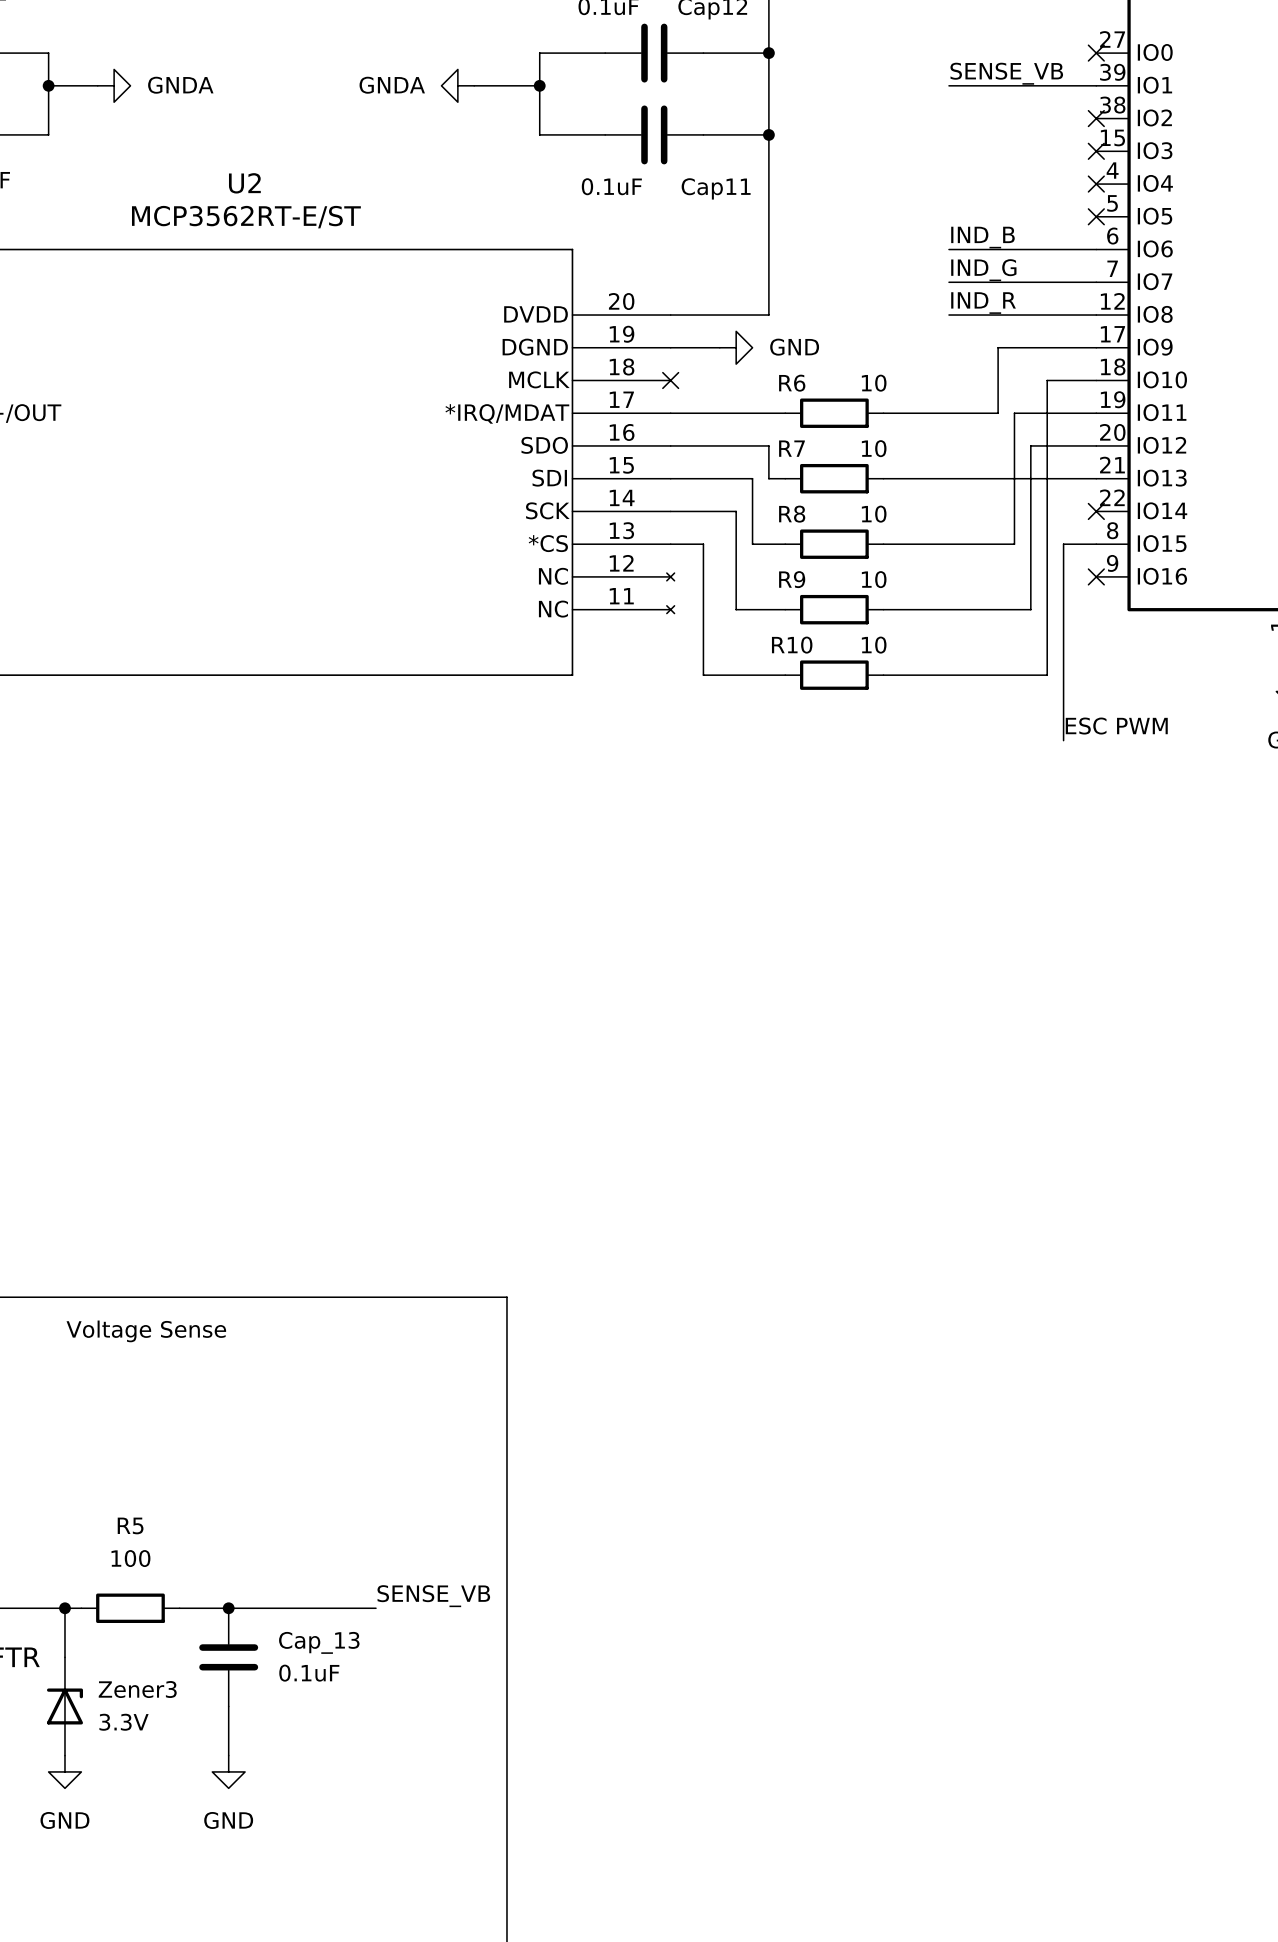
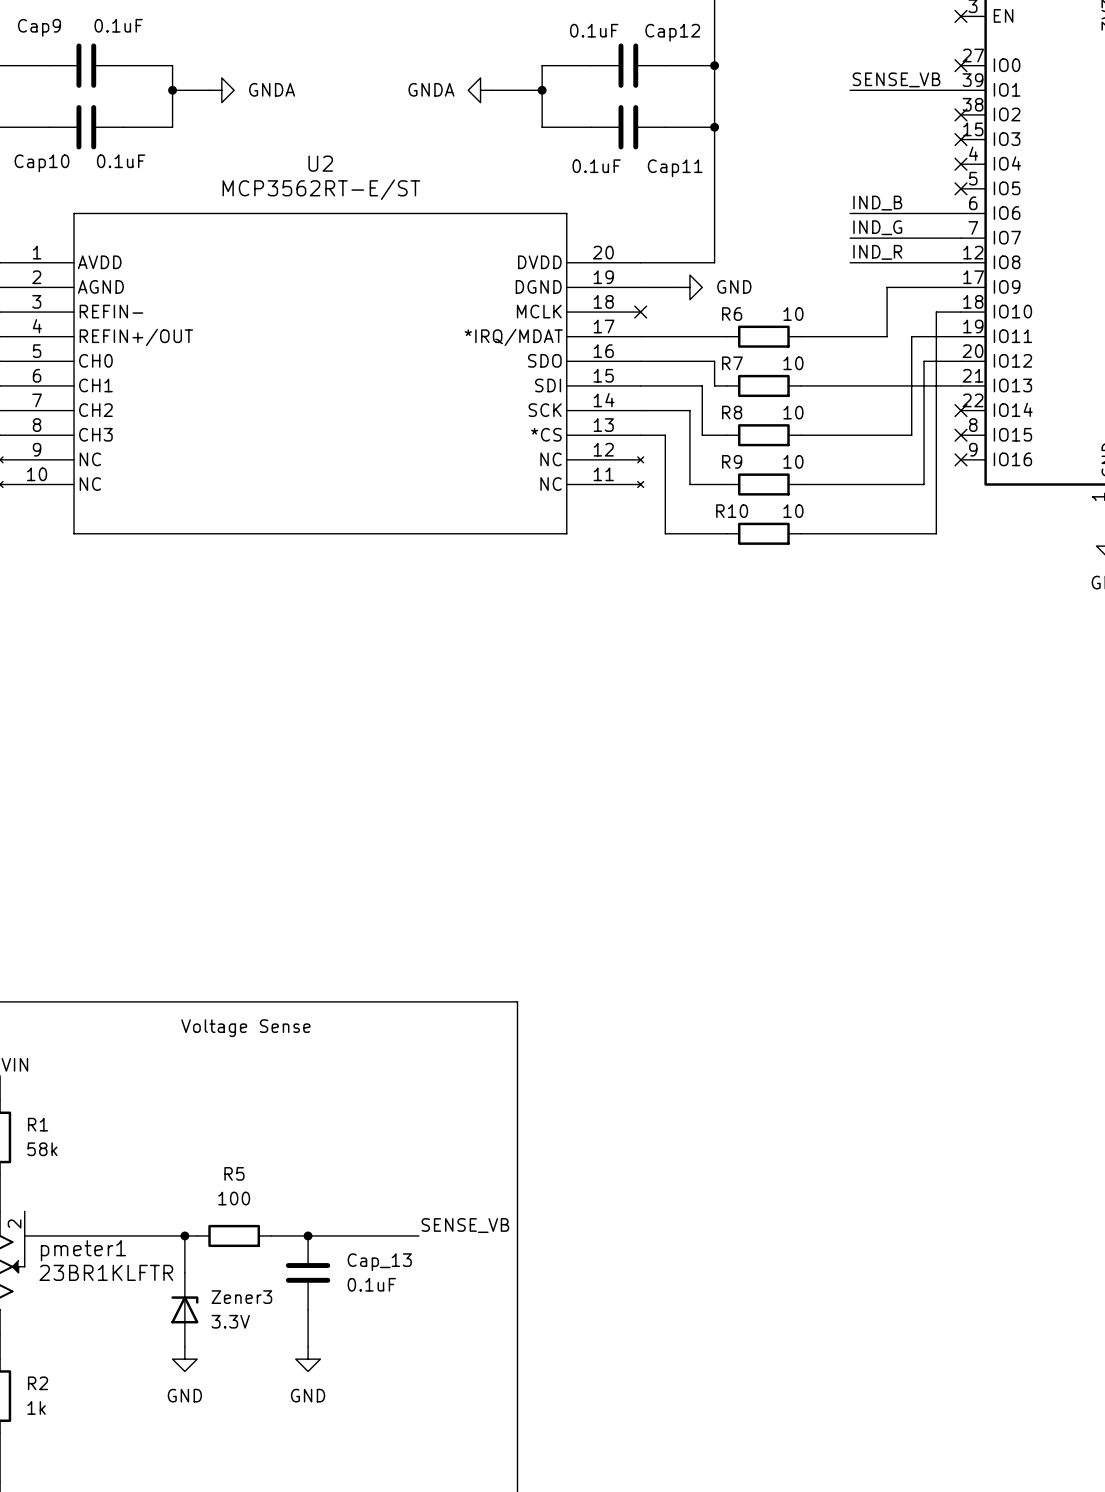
wire: (1063, 380) (1047, 380) (1047, 445) (1030, 445) -> (911, 336) (911, 361)
wire: (1030, 413) (1014, 413) (1014, 544) -> none
wire: (1030, 544) (1030, 609) -> (911, 435) (899, 435)
wire: (1063, 544) (1096, 544) -> (936, 435) (936, 312)
no-connect mark: none -> (960, 435)
wire: (1047, 609) (1047, 675) -> (924, 484) (911, 484)
wire: (1063, 675) (1063, 740) -> (936, 533) (924, 533)
label: ESC PWM (1116, 726) -> none

